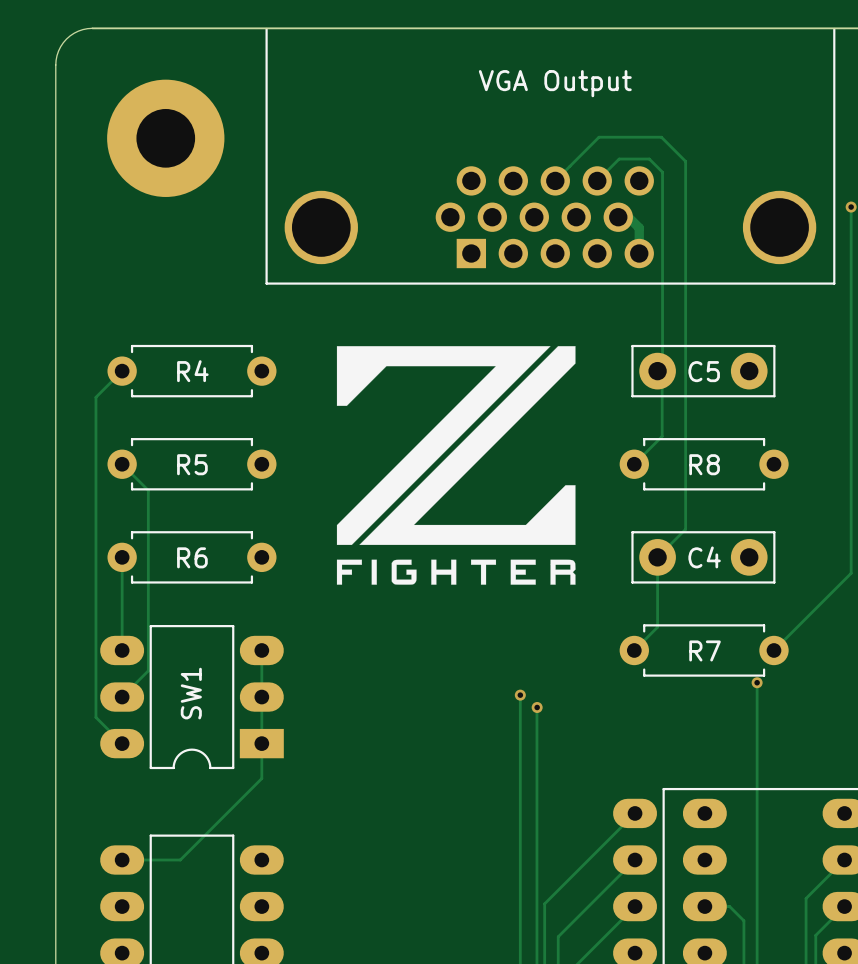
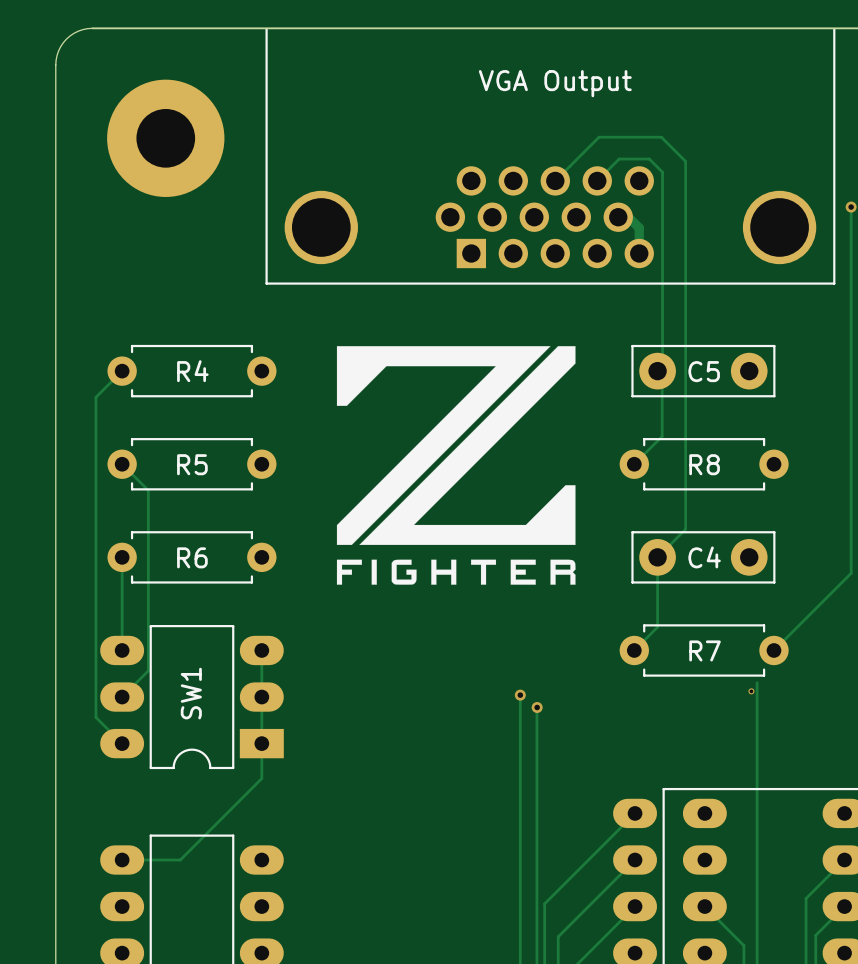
via: (757, 682) -> none
via: none -> (751, 691)
track: (704, 906) (729, 906) (743, 920) (743, 945) -> (704, 906) (743, 945)

